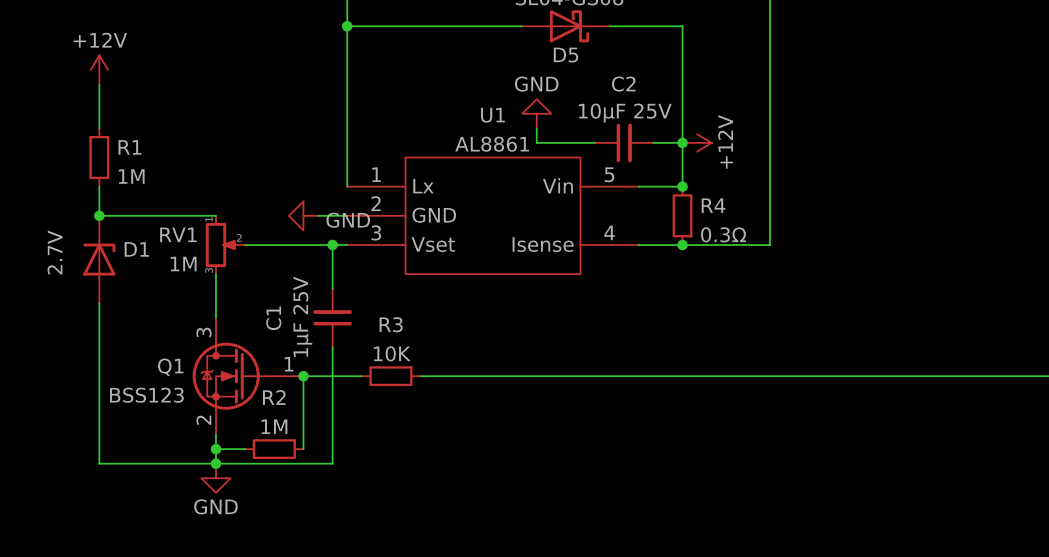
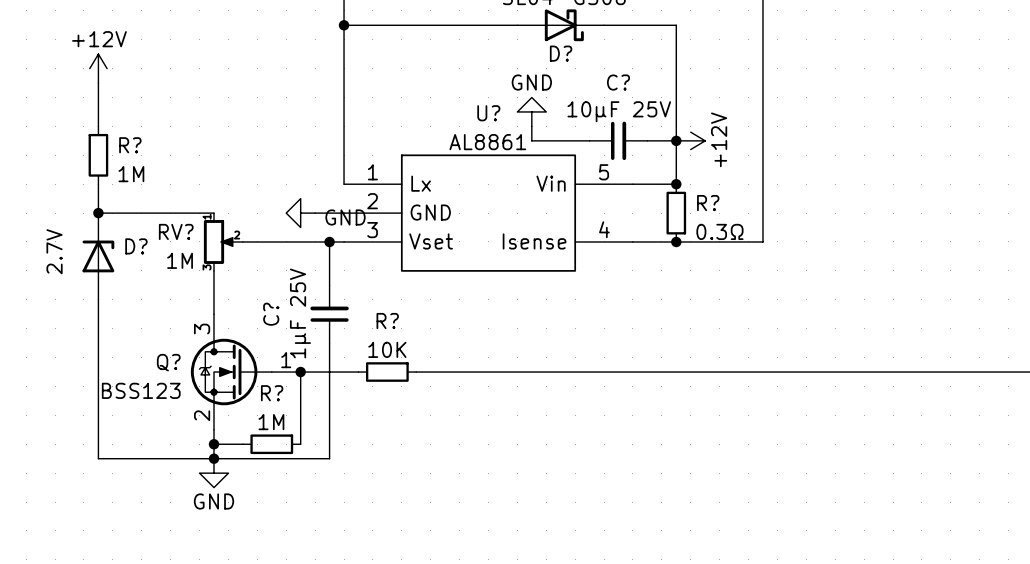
D5 name: D5 (566, 55) -> D? (561, 53)
C2 name: C2 (623, 84) -> C? (618, 82)
U1 name: U1 (492, 115) -> U? (488, 113)
R1 name: R1 (129, 147) -> R? (130, 145)
R4 name: R4 (713, 205) -> R? (708, 203)
RV1 name: RV1 (178, 234) -> RV? (176, 231)
D1 name: D1 (136, 249) -> D? (136, 246)
C1 name: C1 (273, 318) -> C? (271, 314)
R3 name: R3 (391, 324) -> R? (387, 321)
Q1 name: Q1 (170, 367) -> Q? (168, 362)
R2 name: R2 (274, 397) -> R? (272, 393)

